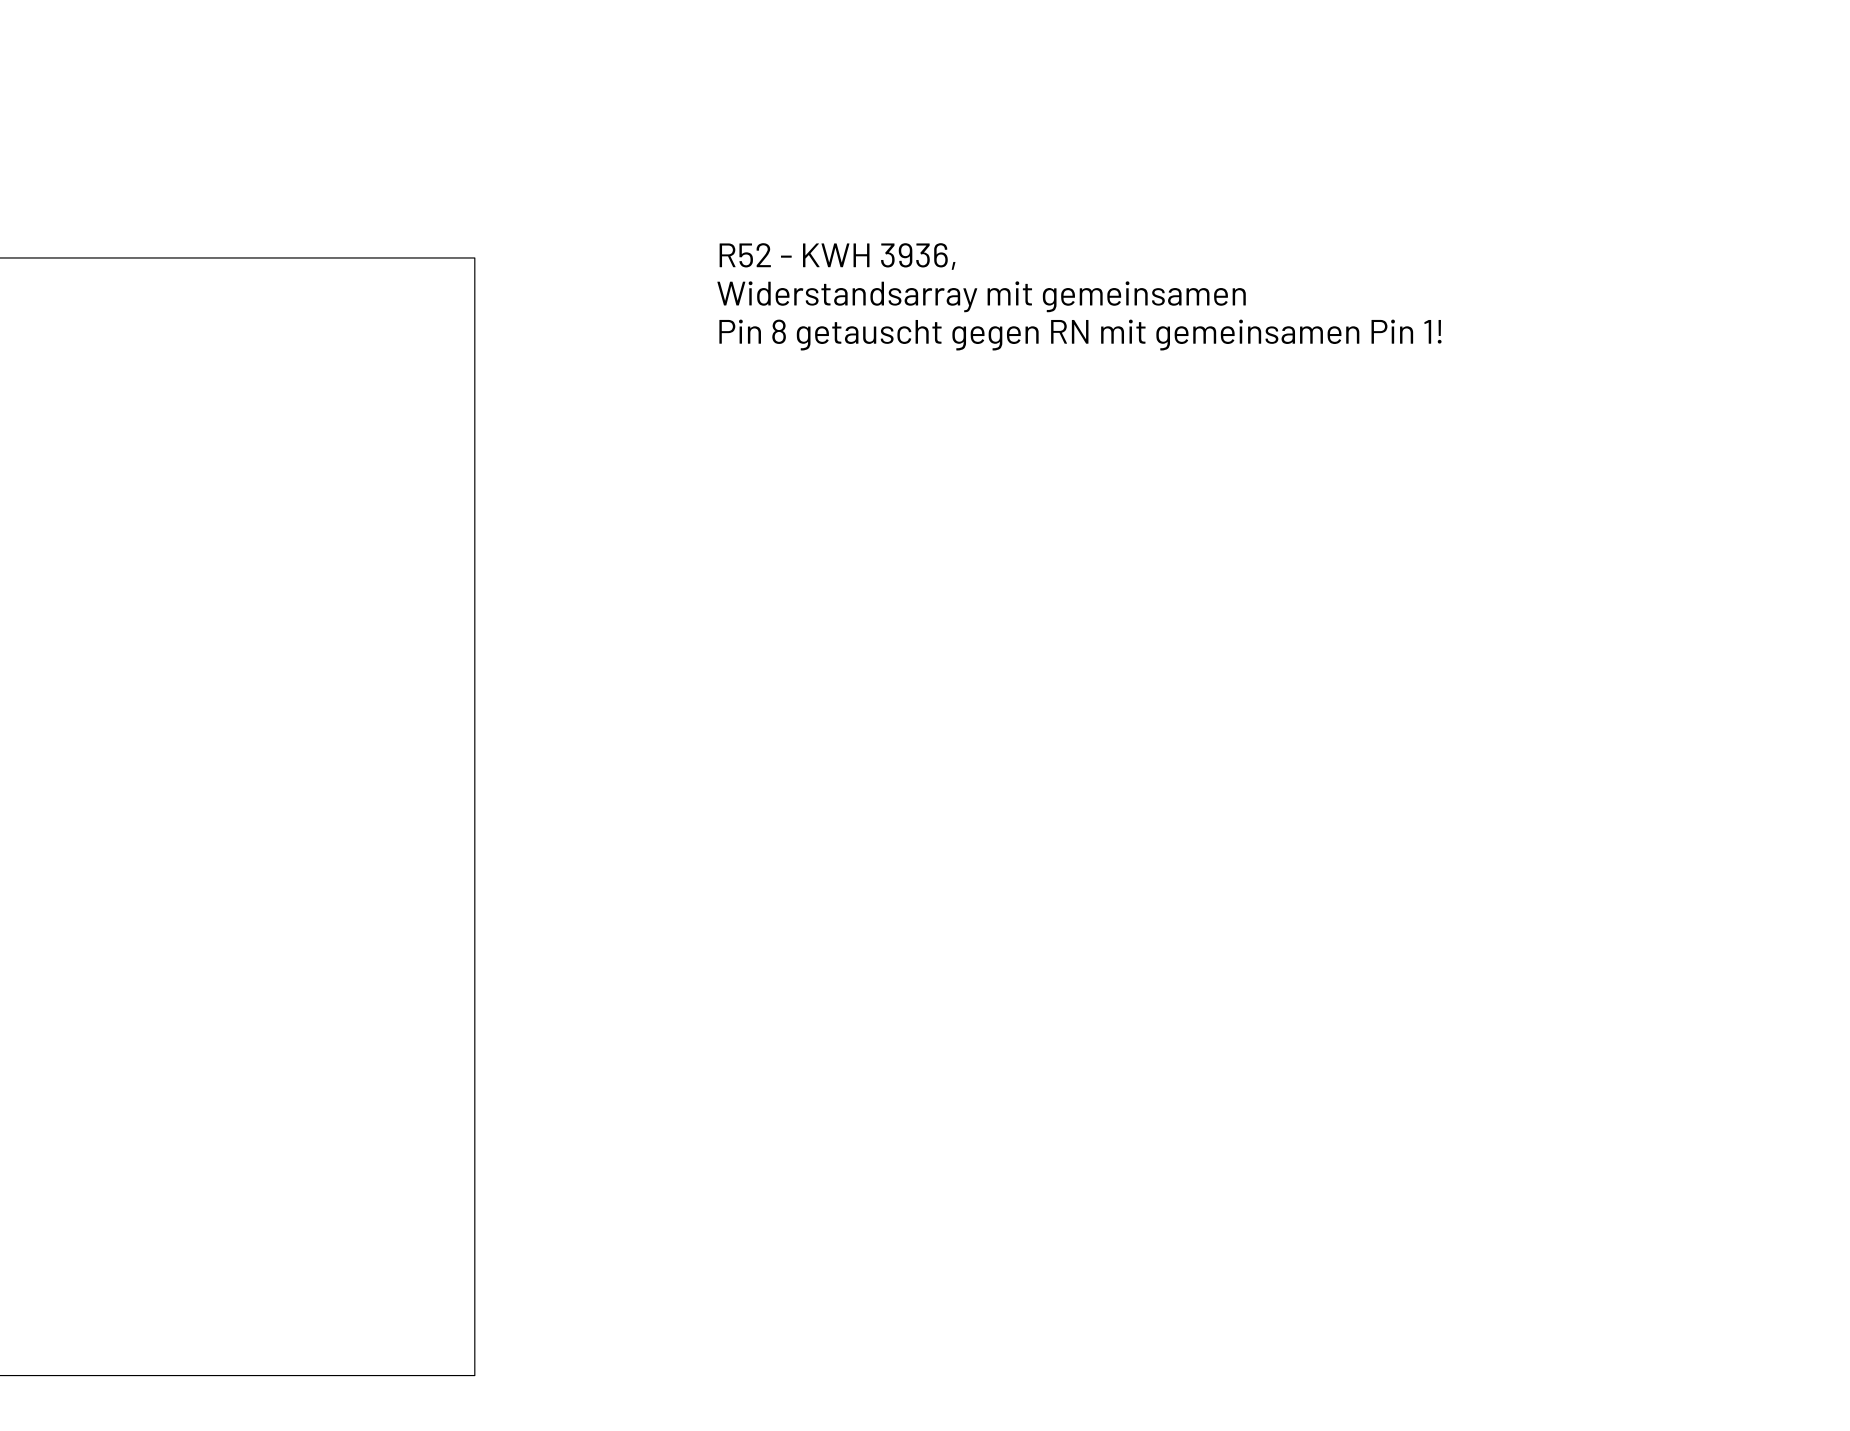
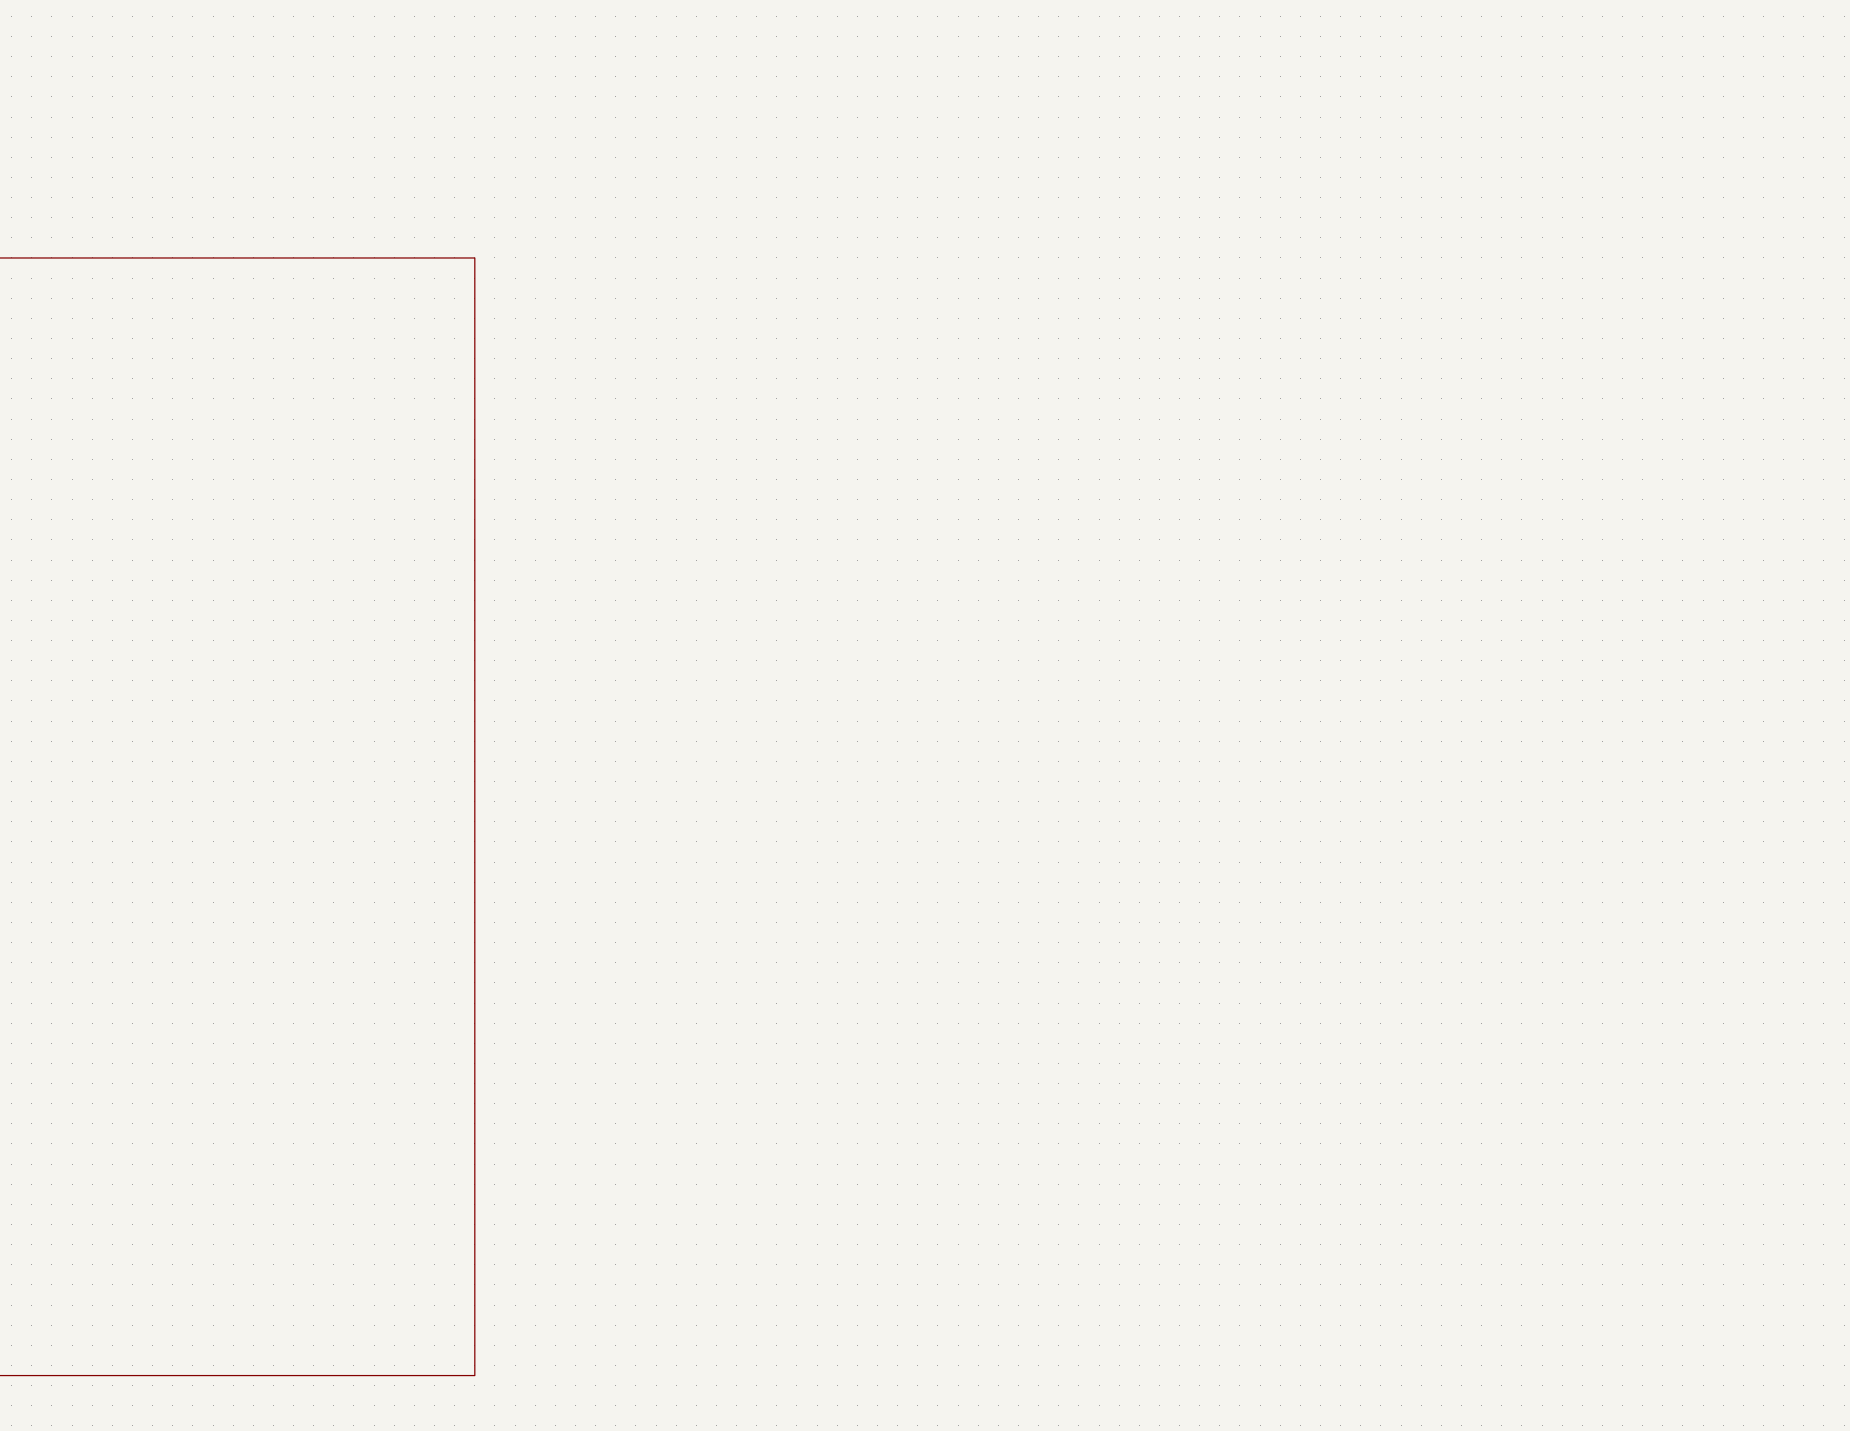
text: R52 - KWH 3936, (837, 256) -> none
text: Widerstandsarray mit gemeinsamen (981, 296) -> none
text: Pin 8 getauscht gegen RN mit gemeinsamen Pin 1! (1080, 335) -> none

